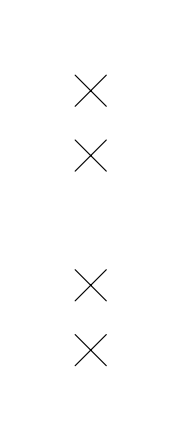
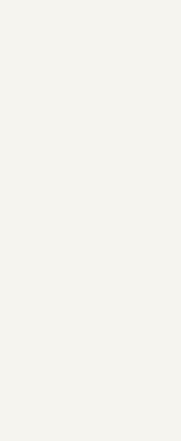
no-connect mark: (90, 90) -> none
no-connect mark: (90, 155) -> none
no-connect mark: (90, 285) -> none
no-connect mark: (90, 350) -> none

